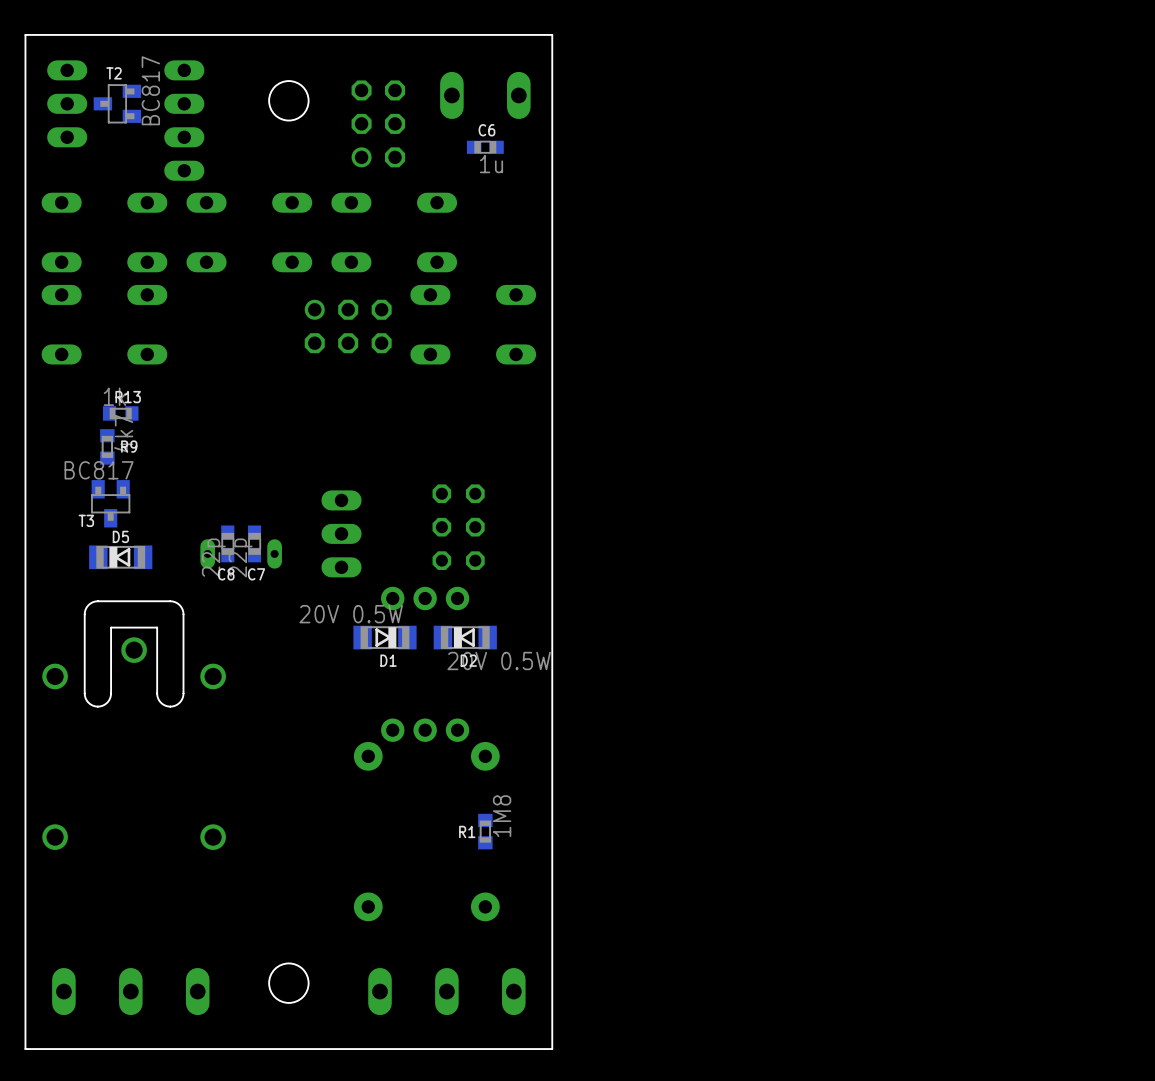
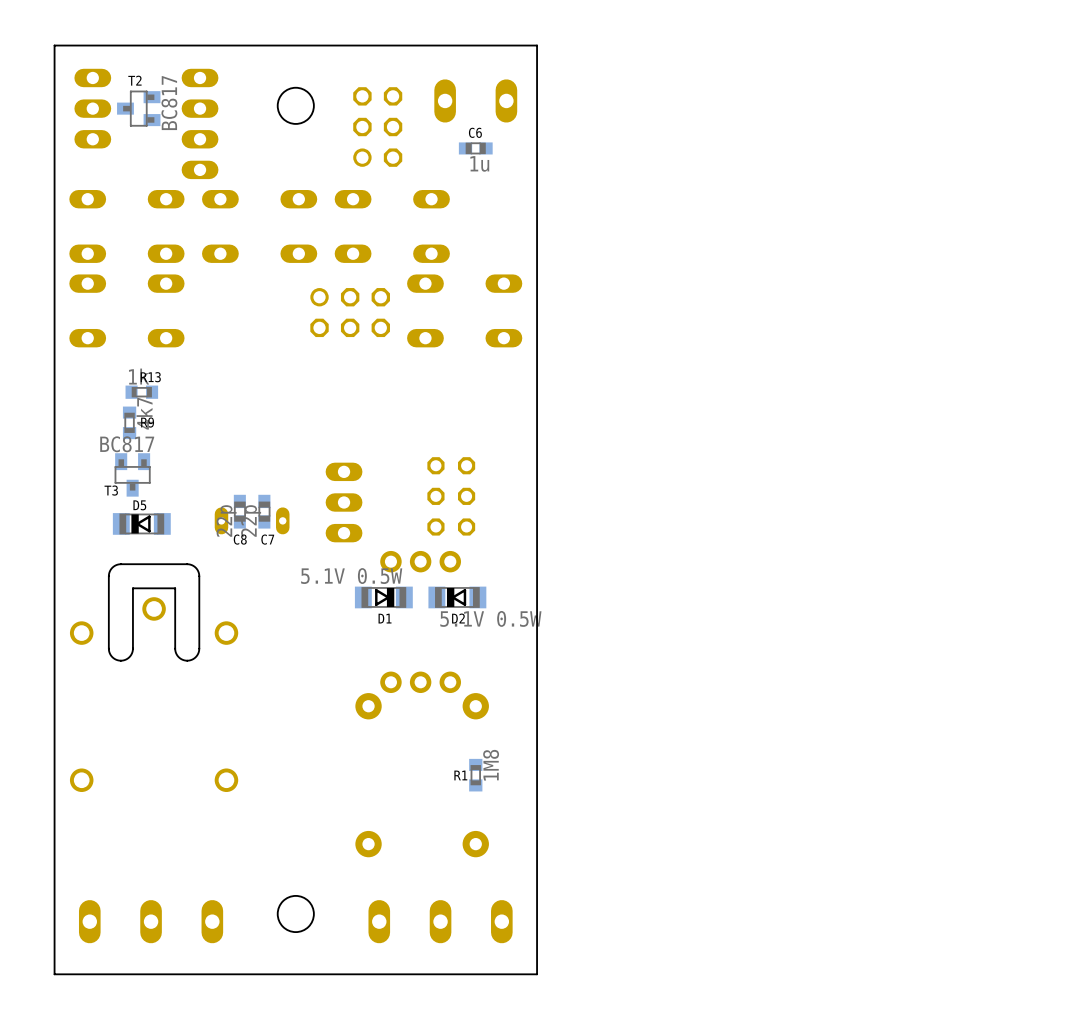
D1 value: 20V 0.5W (351, 614) -> 5.1V 0.5W (351, 576)
D2 value: 20V 0.5W (499, 660) -> 5.1V 0.5W (490, 618)

